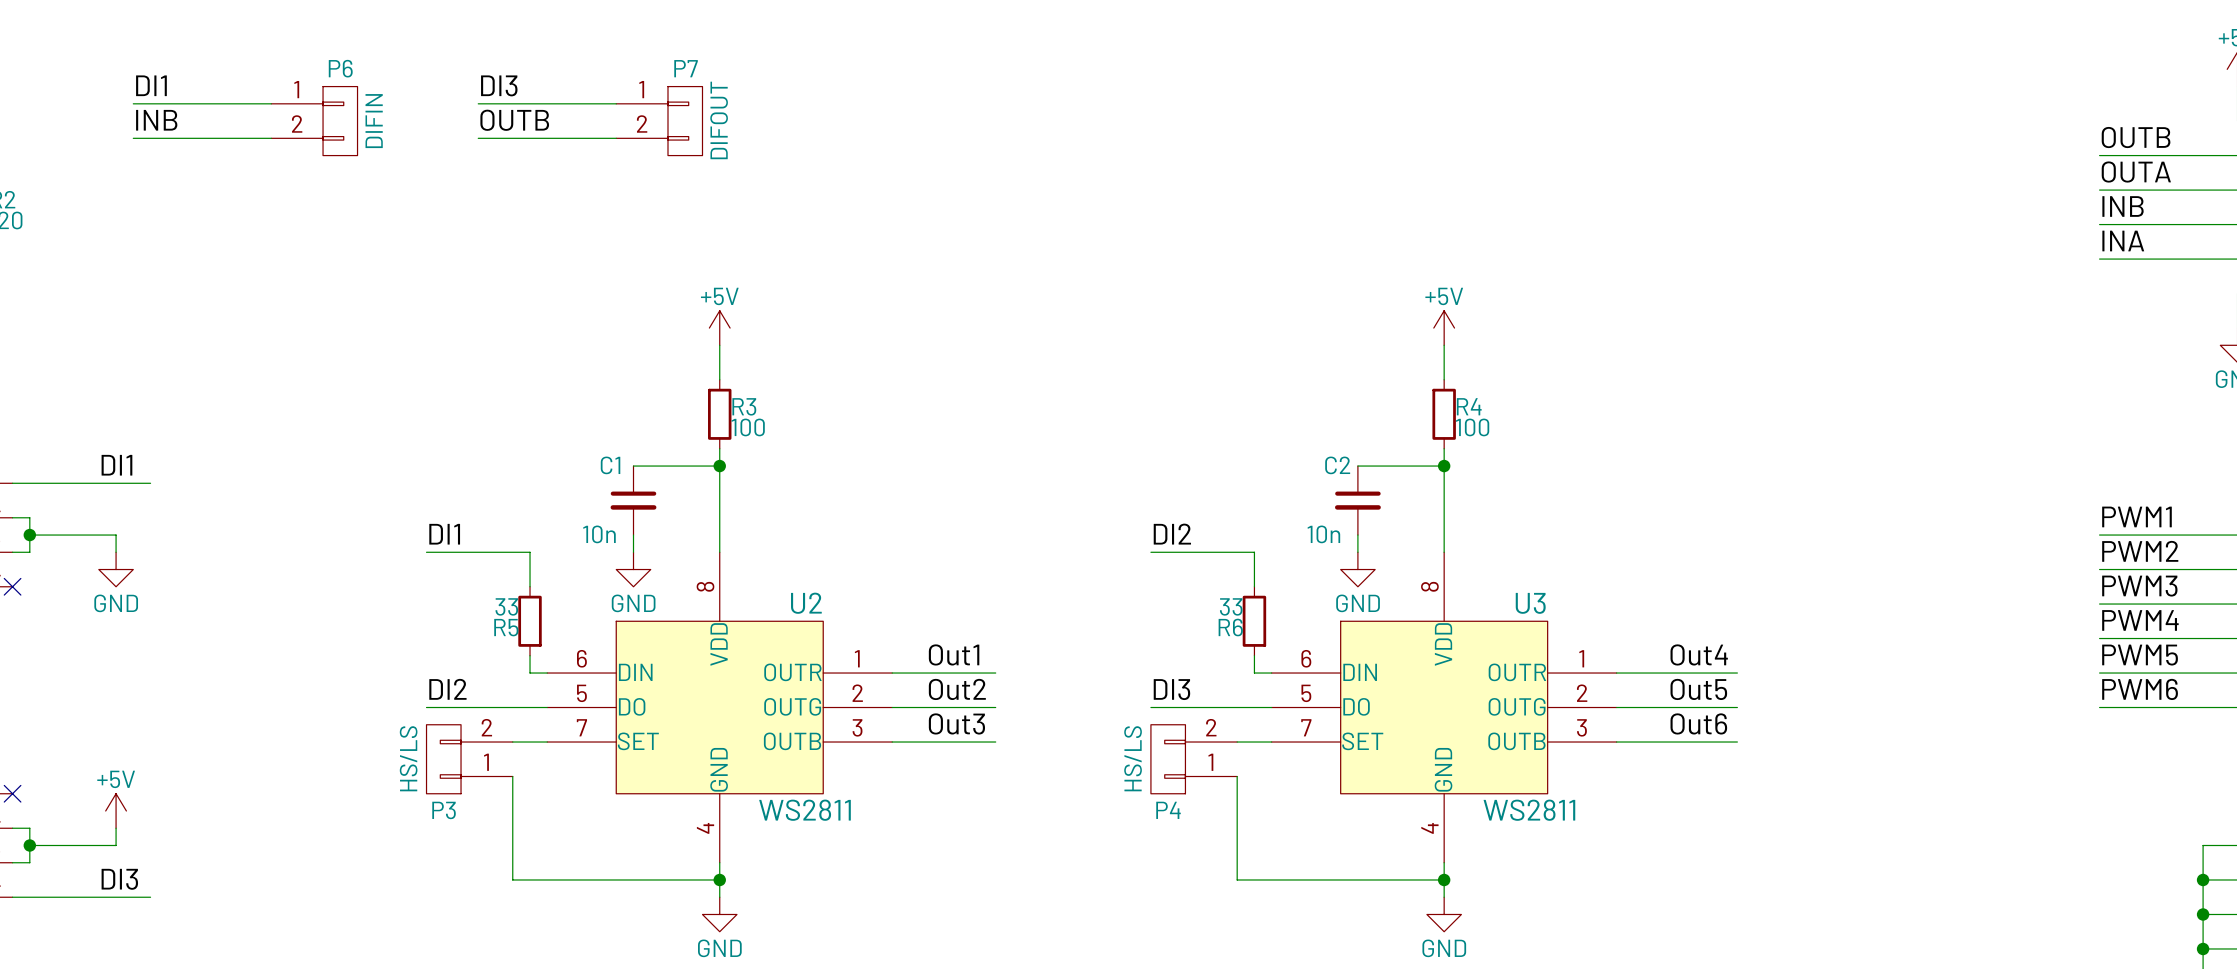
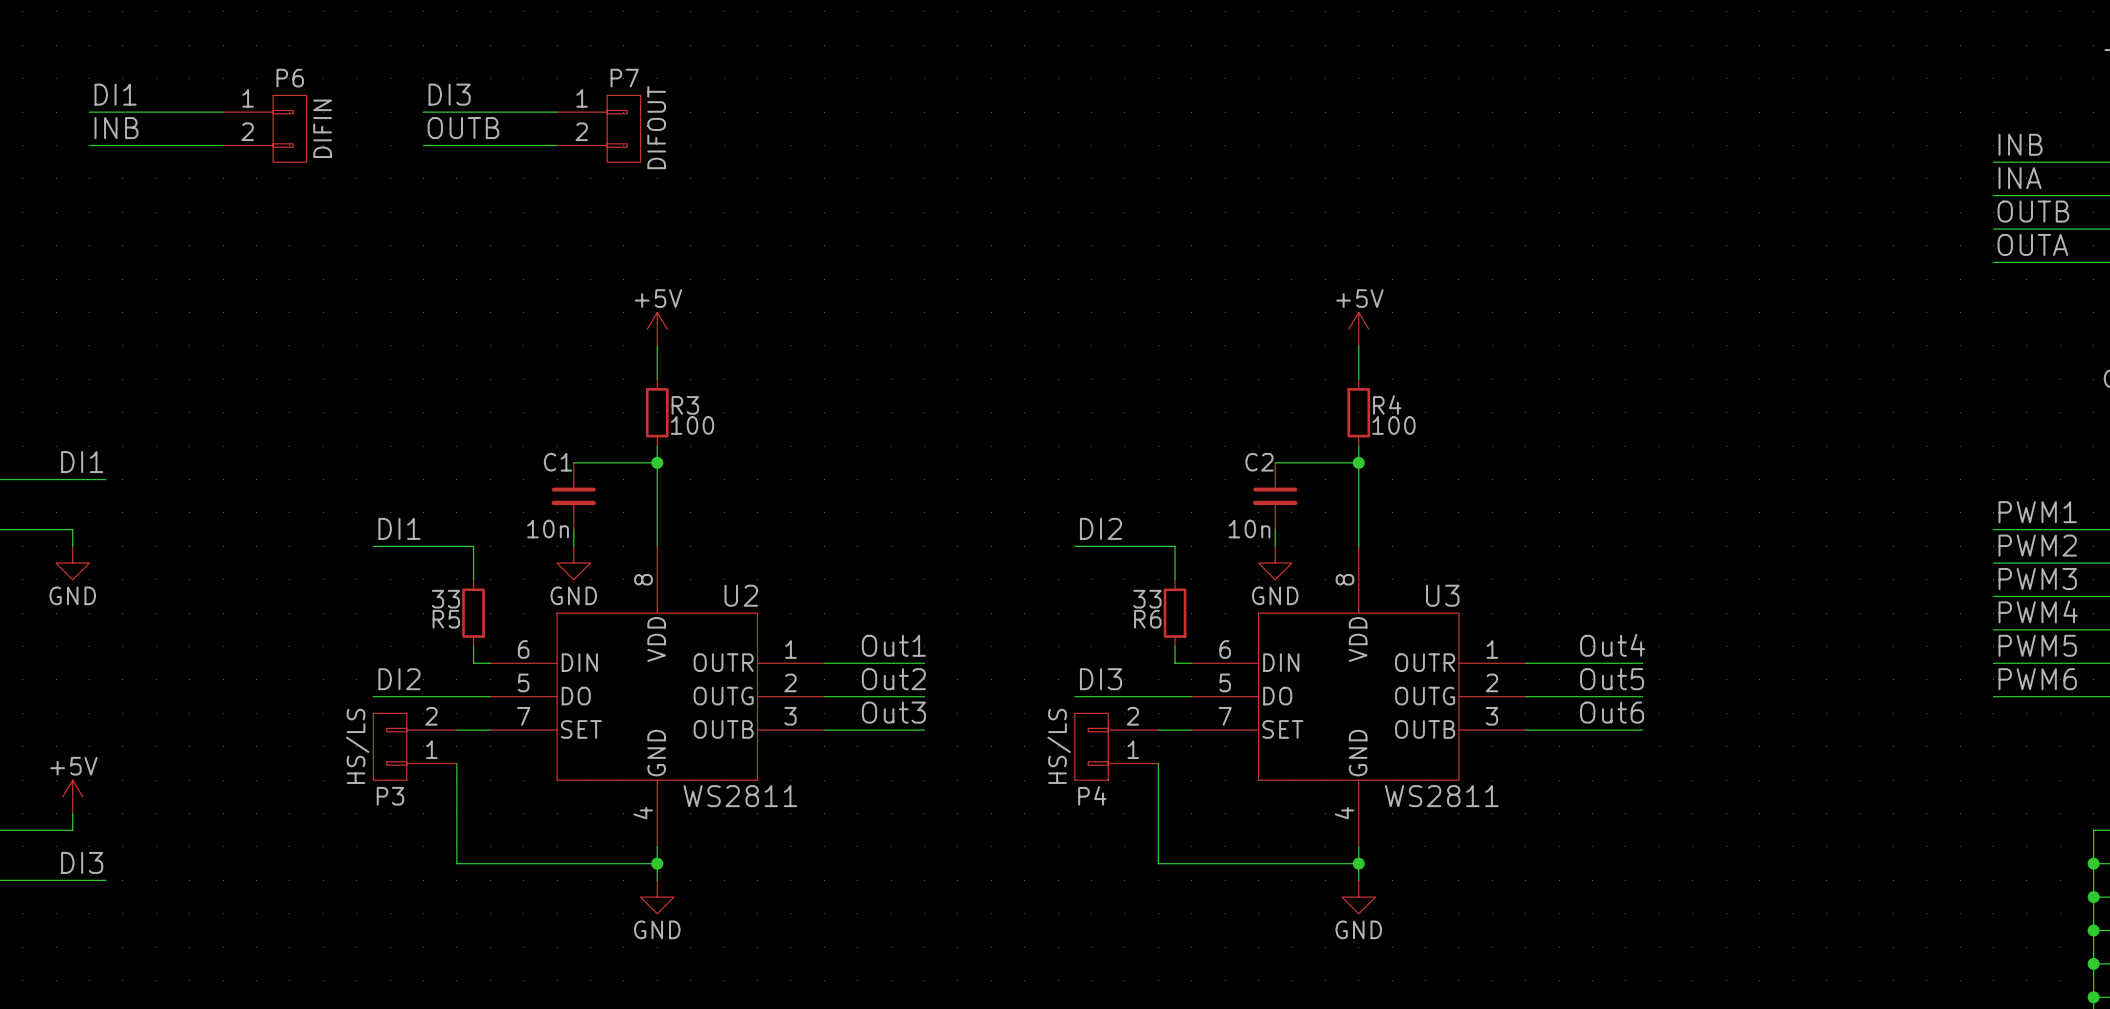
label: OUTB (2136, 137) -> INB (2020, 144)
label: OUTA (2136, 172) -> INA (2020, 178)
label: INB (2123, 206) -> OUTB (2033, 211)
label: INA (2123, 241) -> OUTA (2032, 244)

